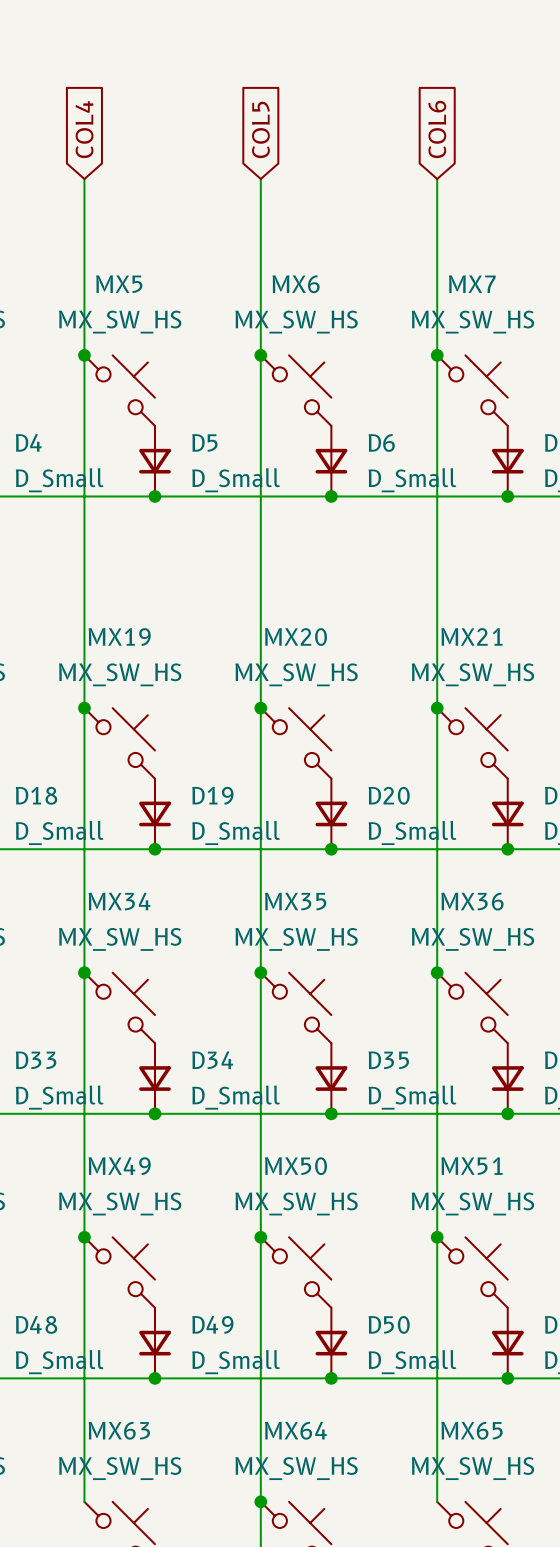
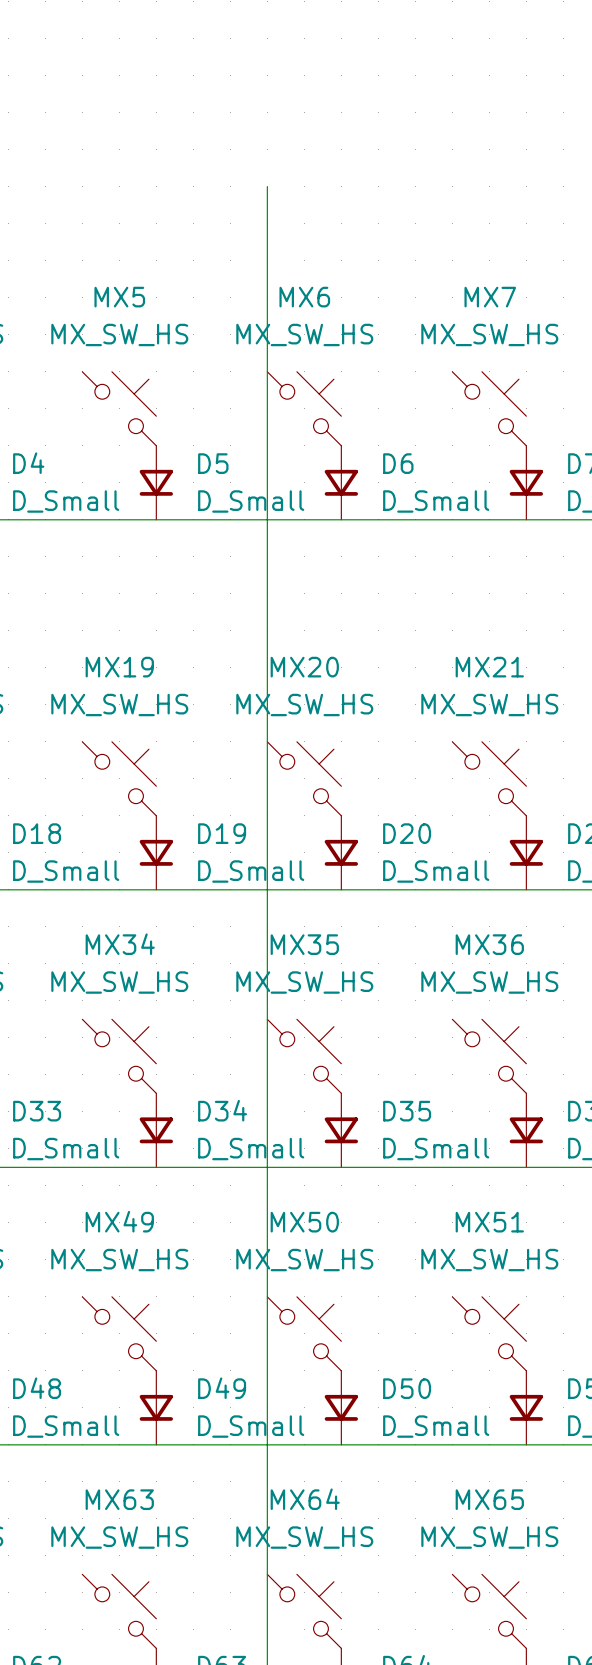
global label: COL4 (84, 129) -> none
global label: COL5 (260, 129) -> none
global label: COL6 (437, 129) -> none
wire: (84, 178) (84, 1501) -> none
wire: (437, 178) (437, 1501) -> none
junction: (84, 355) -> none
junction: (260, 355) -> none
junction: (437, 355) -> none
junction: (154, 496) -> none
junction: (331, 496) -> none
junction: (507, 496) -> none
junction: (84, 708) -> none
junction: (260, 708) -> none
junction: (437, 708) -> none
junction: (154, 849) -> none
junction: (331, 849) -> none
junction: (507, 849) -> none
junction: (84, 972) -> none
junction: (260, 972) -> none
junction: (437, 972) -> none
junction: (154, 1113) -> none
junction: (331, 1113) -> none
junction: (507, 1113) -> none
junction: (84, 1237) -> none
junction: (260, 1237) -> none
junction: (437, 1237) -> none
junction: (154, 1378) -> none
junction: (331, 1378) -> none
junction: (507, 1378) -> none
junction: (260, 1501) -> none

